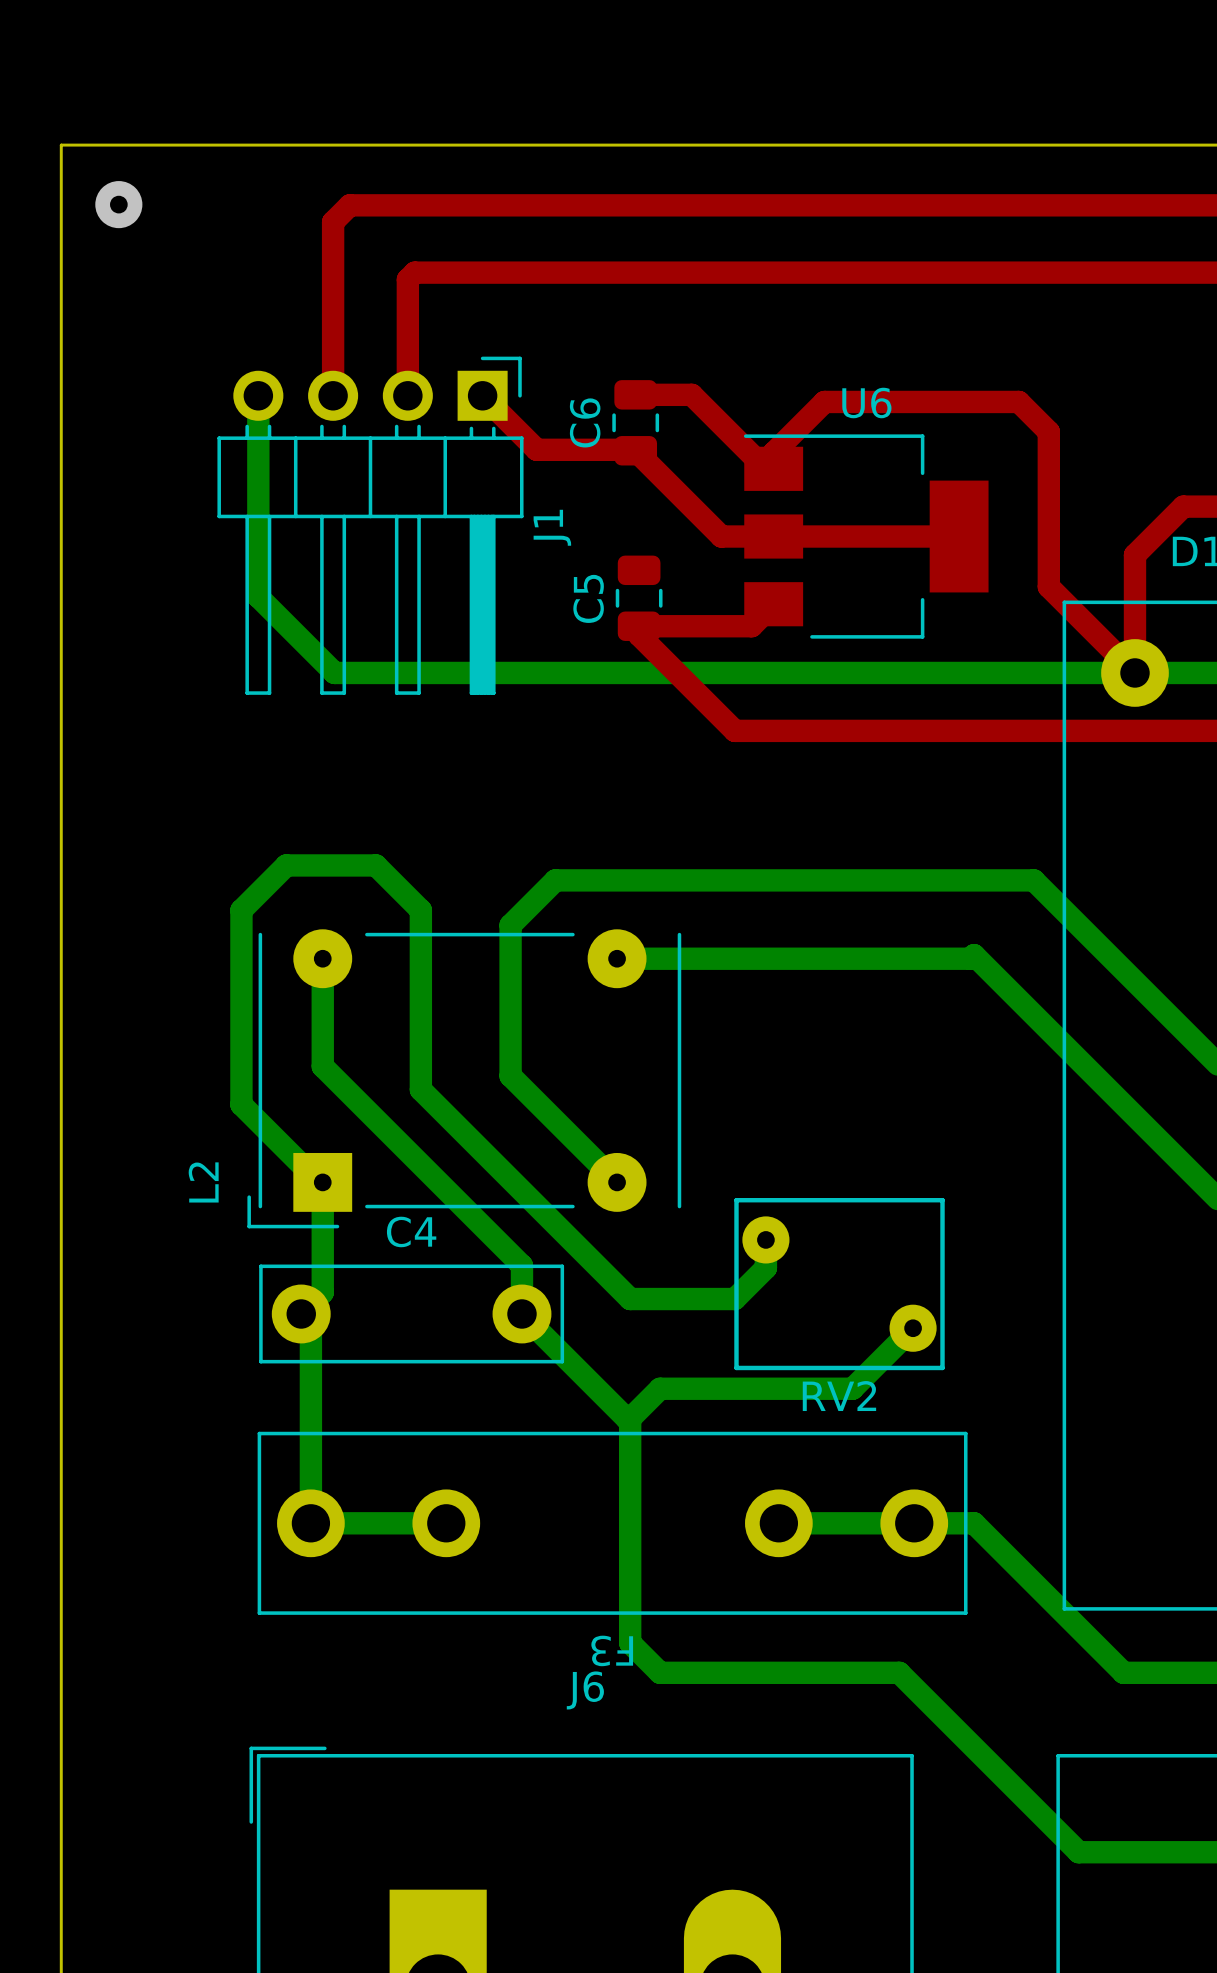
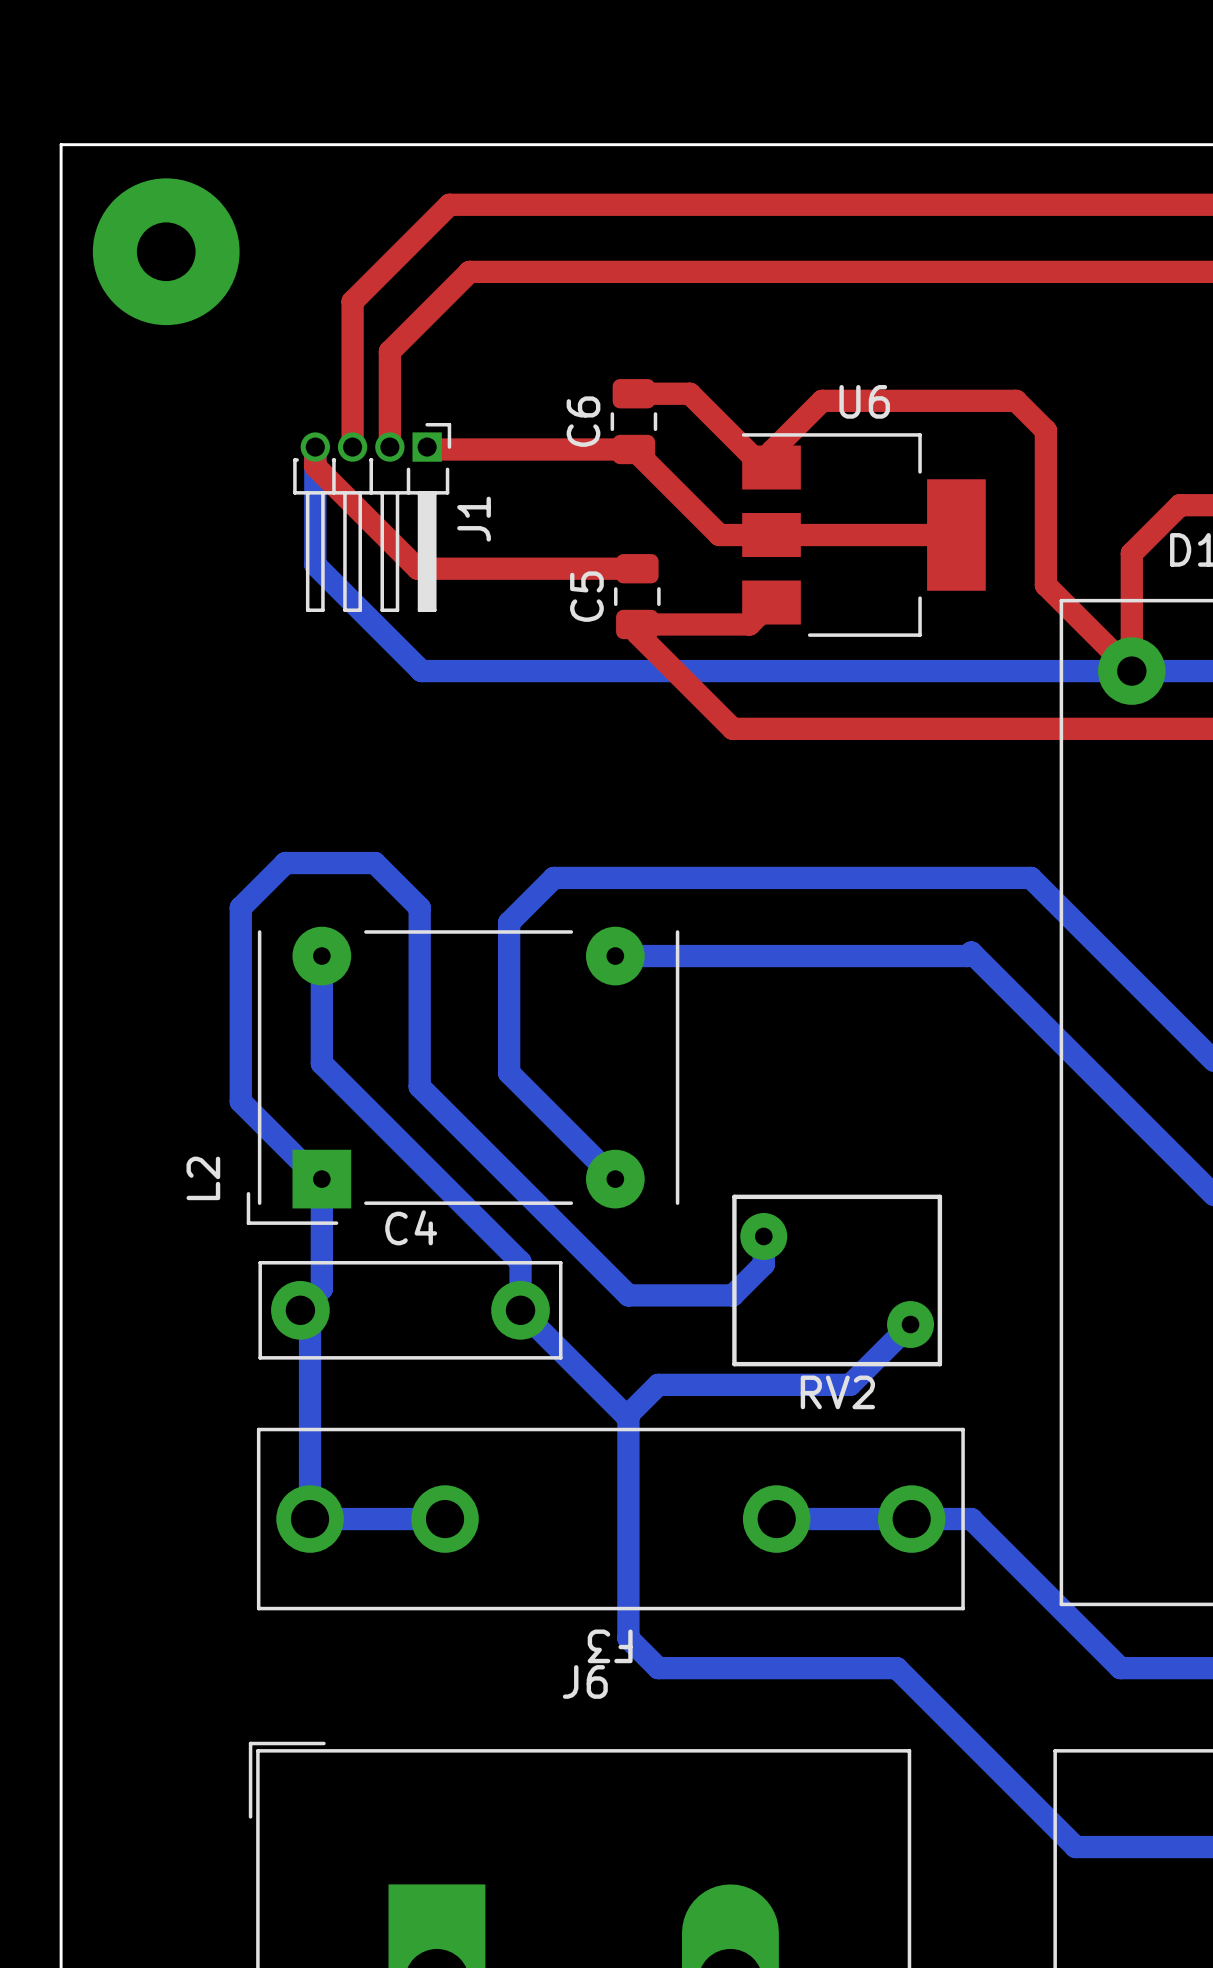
via: (118, 204) -> none
top track: (450, 205) (349, 205) (333, 222) (333, 395) -> (449, 204) (352, 301) (352, 447)
via: none -> (166, 251)
top track: (470, 272) (414, 272) (407, 279) (407, 395) -> (469, 271) (389, 351) (389, 447)
J1 footprint: [217, 356, 524, 695] -> [293, 422, 452, 613]
bottom track: (258, 395) (258, 596) (334, 672) (422, 672) -> (315, 445) (315, 564) (421, 671)
top track: (482, 395) (536, 449) (635, 450) -> (427, 445) (431, 449) (633, 449)
top track: none -> (315, 445) (315, 466) (417, 568) (637, 568)
J1 name position: J1 (552, 527) -> J1 (474, 519)

